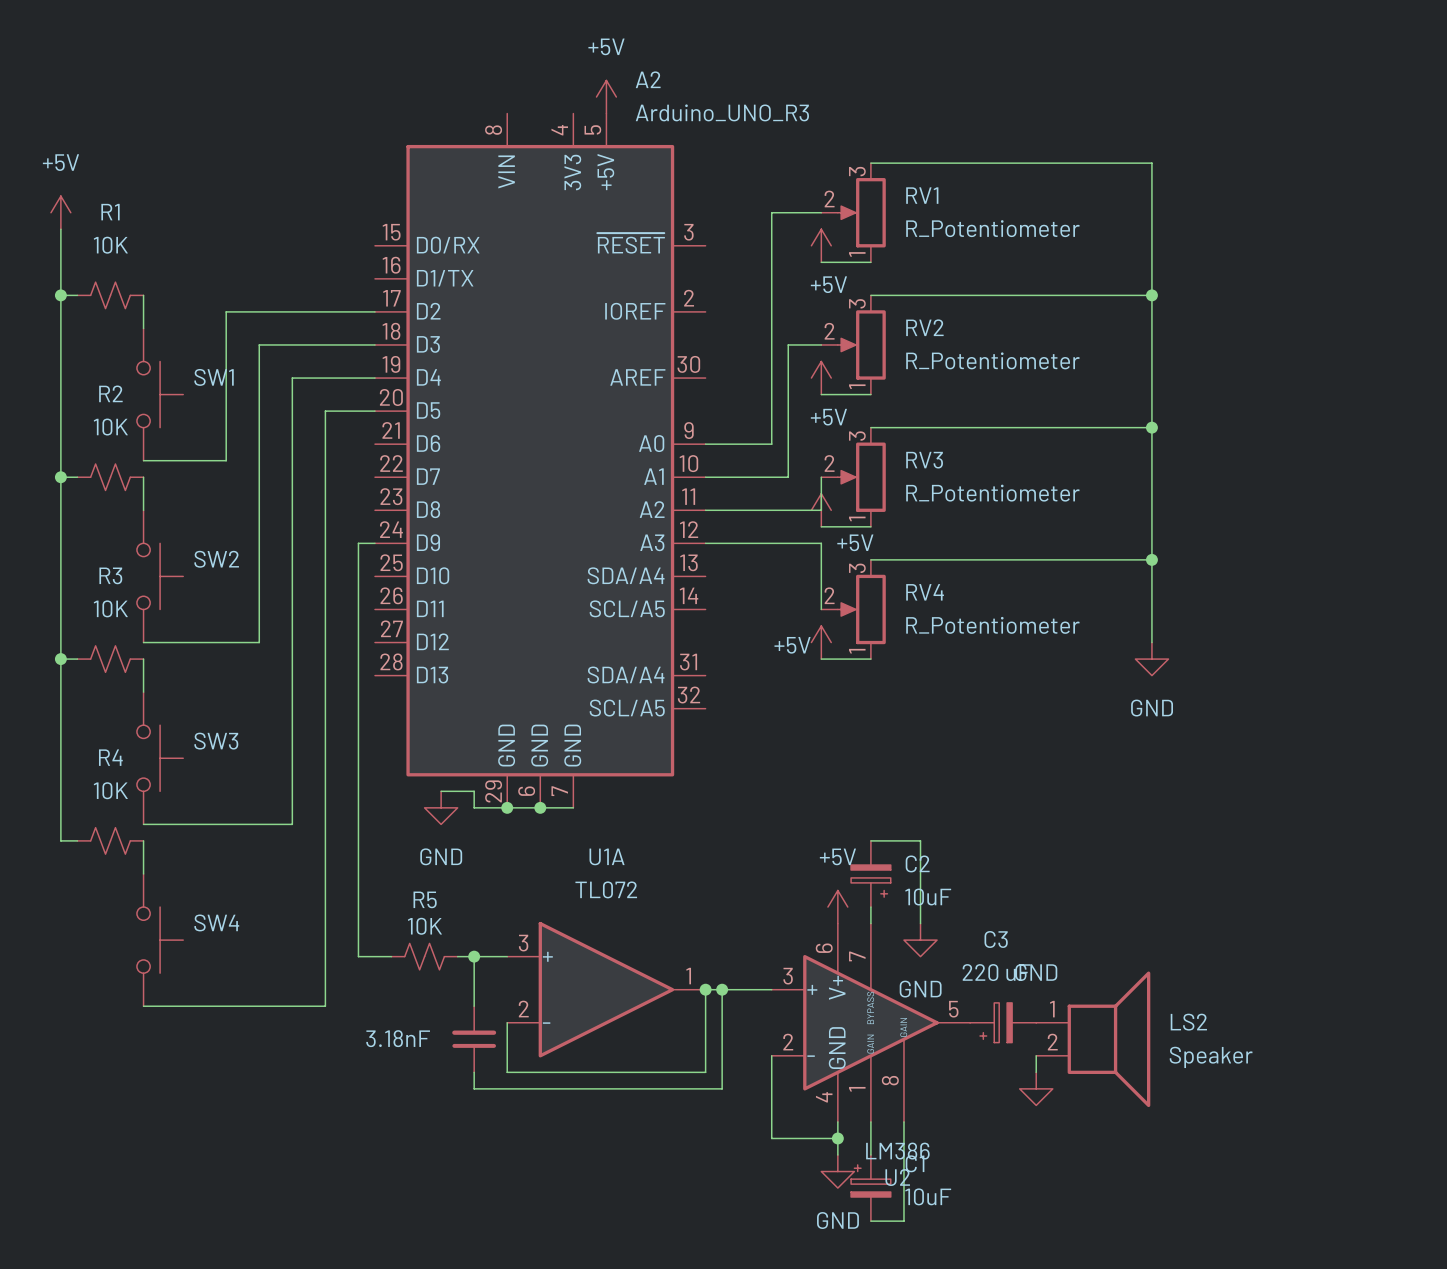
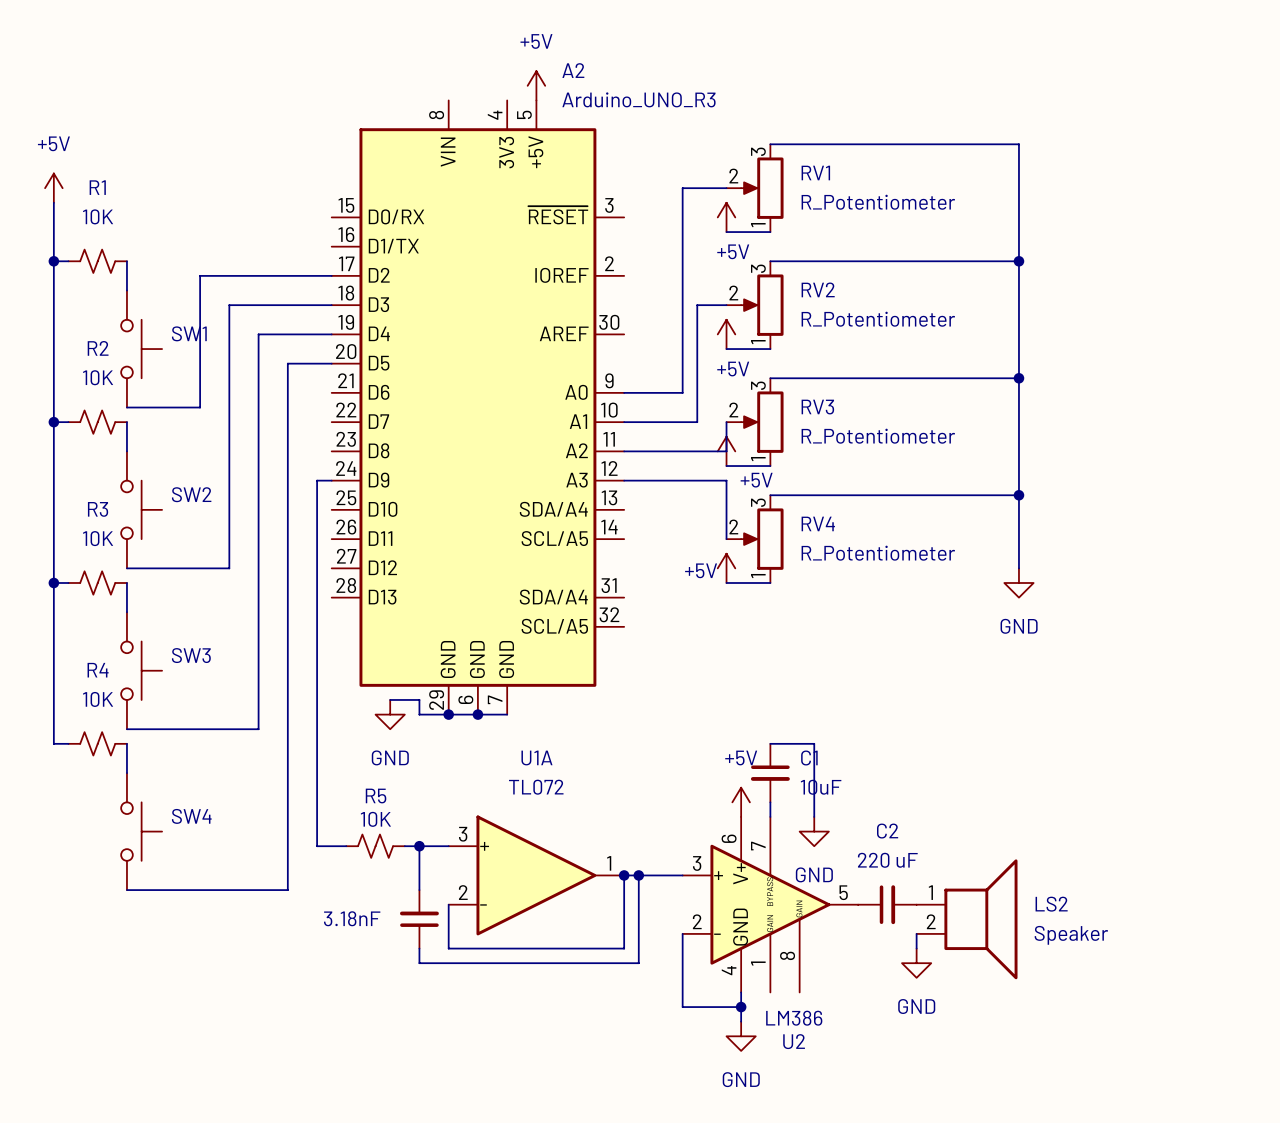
C2 symbol: [851, 840, 891, 908] -> [858, 885, 917, 925]
C2 name position: C2 (917, 863) -> C2 (887, 831)
C2 value: 10uF (928, 897) -> 220 uF (887, 860)
power symbol text position: GND (1036, 972) -> GND (916, 1006)
C3: 220 uF (1003, 1022) -> none
wire: (870, 1121) (870, 1155) -> none
wire: (903, 1121) (903, 1221) (870, 1221) -> none
C1 symbol: [851, 1155, 891, 1222] -> [750, 743, 790, 803]

